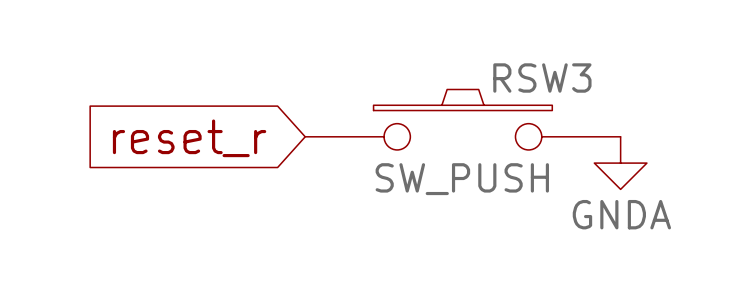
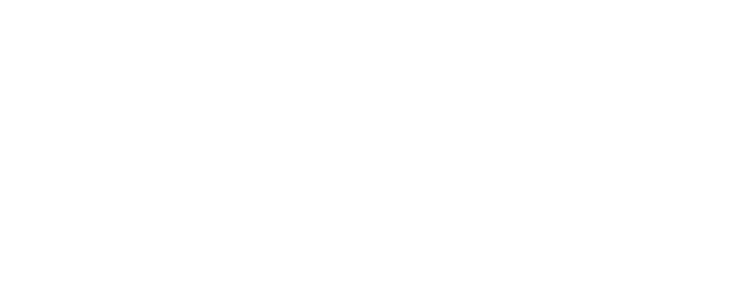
RSW3: SW_PUSH (462, 119) -> none
global label: reset_r (189, 138) -> none
power symbol: GNDA (620, 163) -> none

